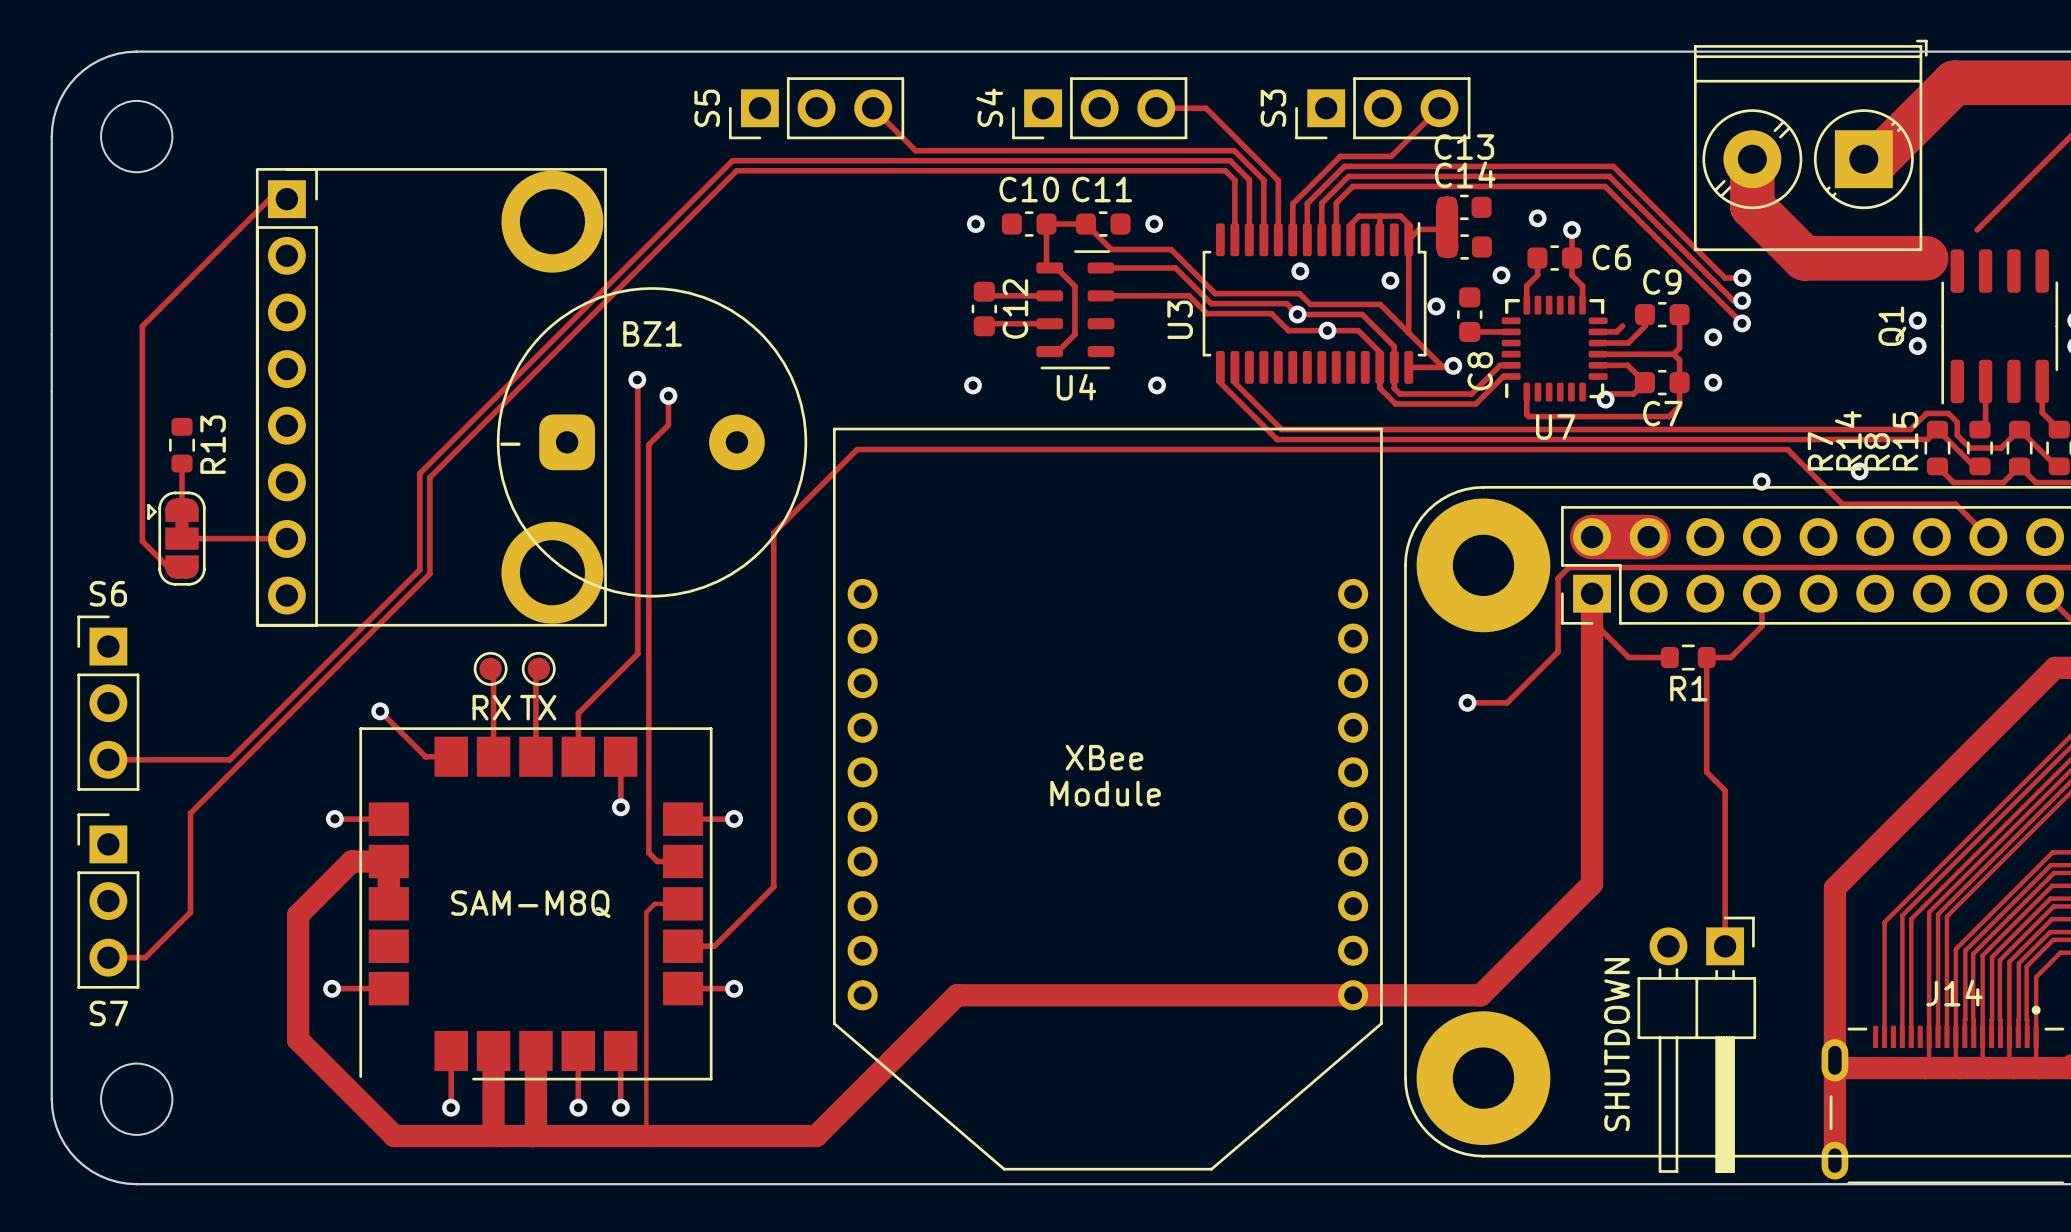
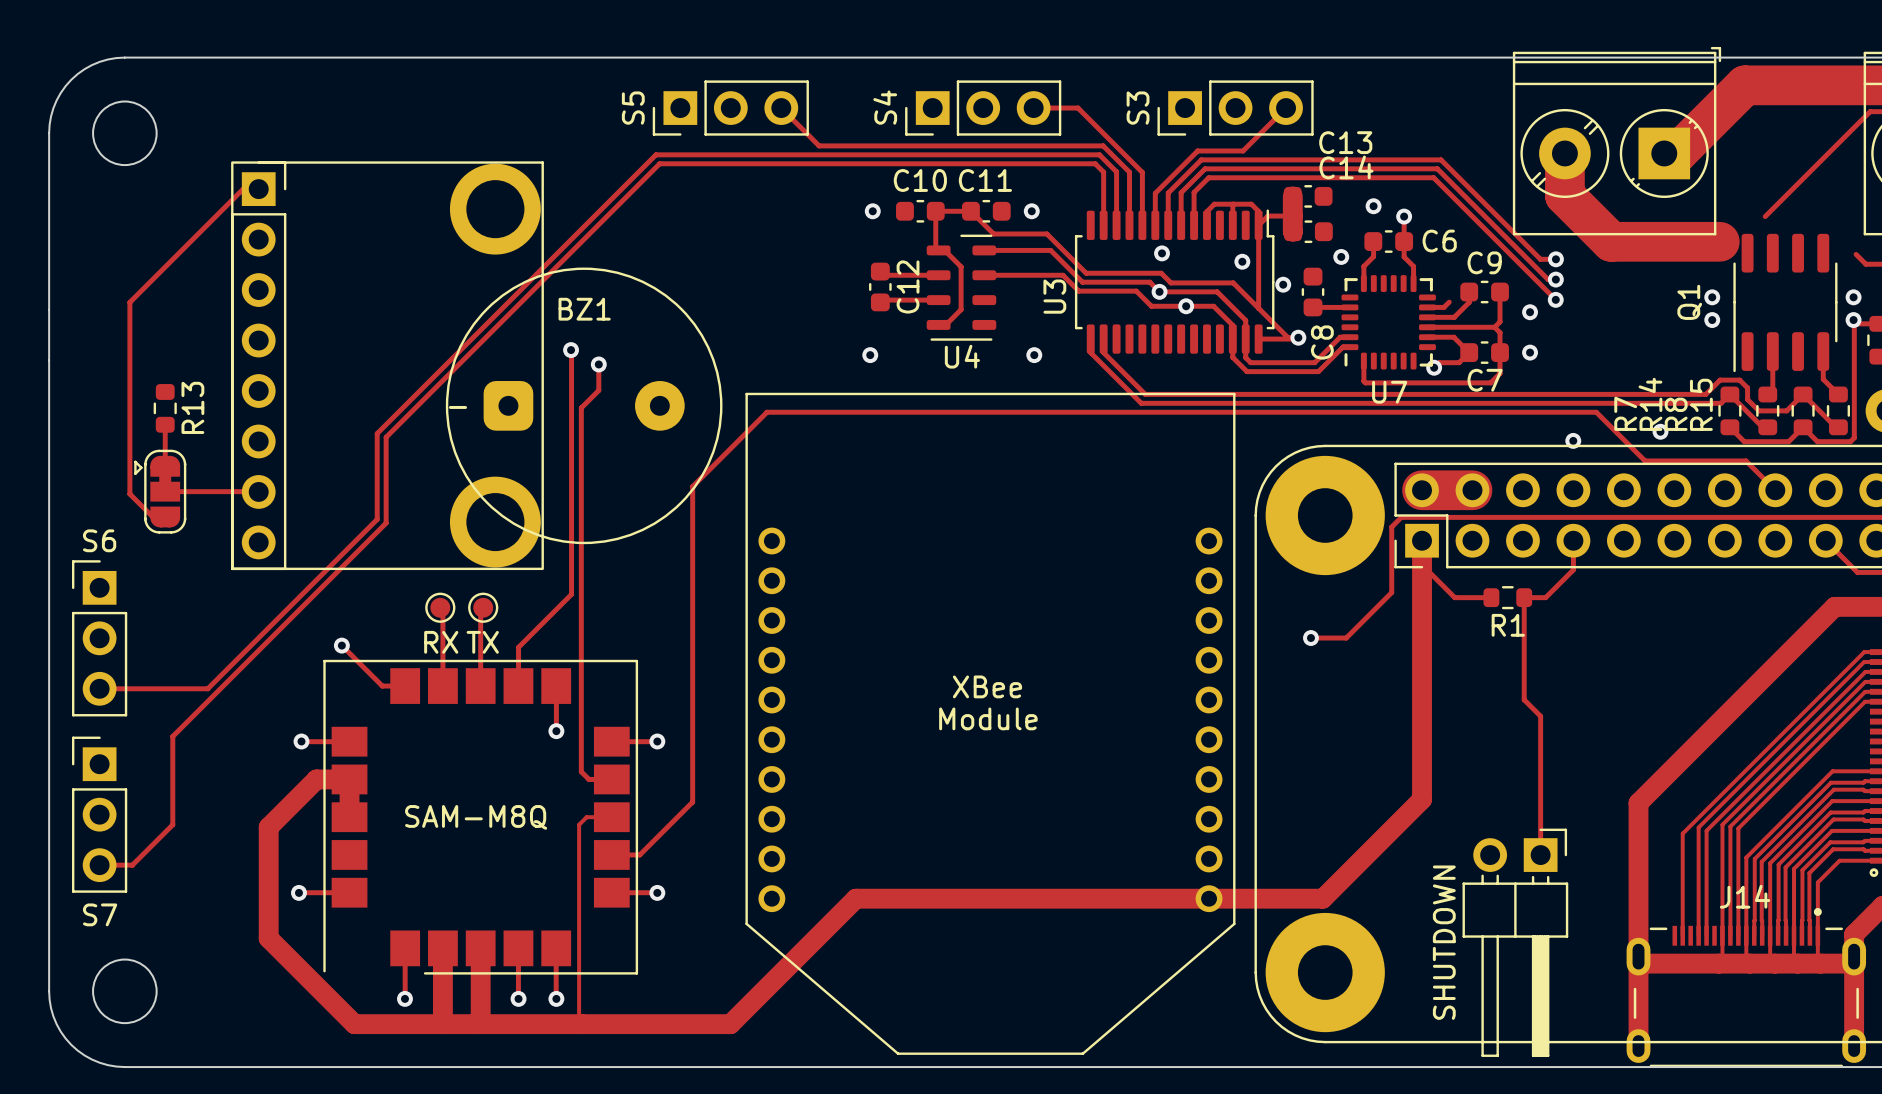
C13 name position: C13 (1464, 147) -> C13 (1345, 142)
C14 name position: C14 (1465, 174) -> C14 (1346, 167)

